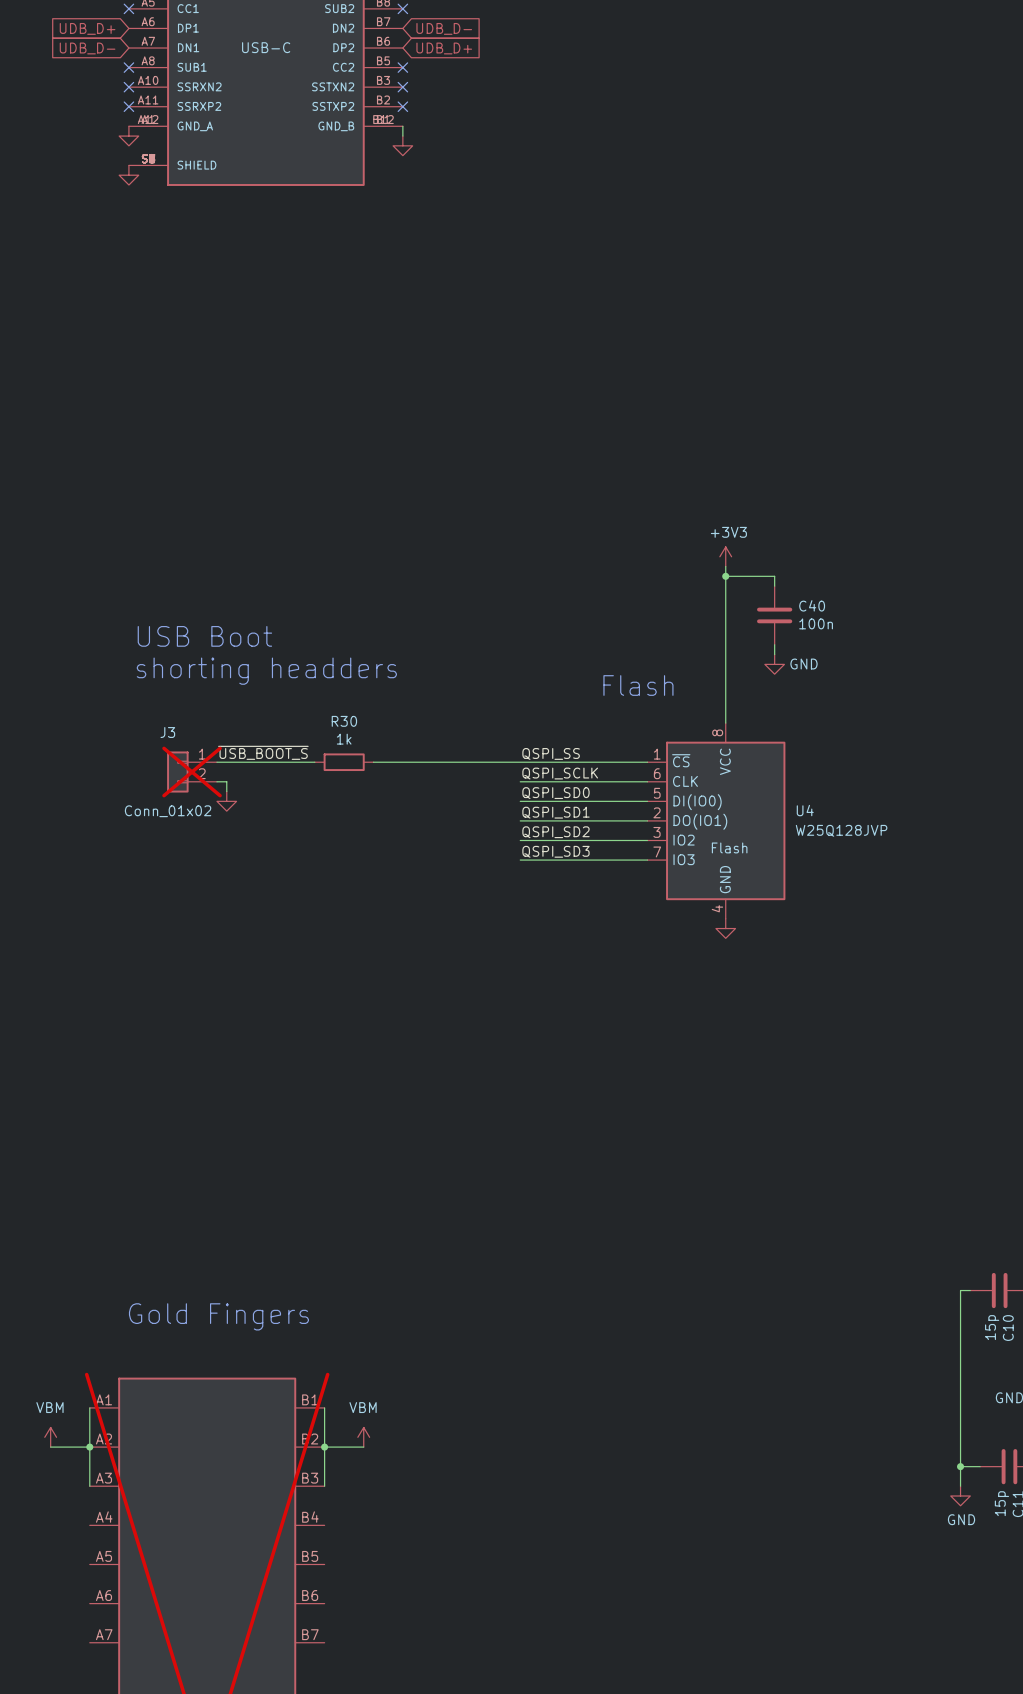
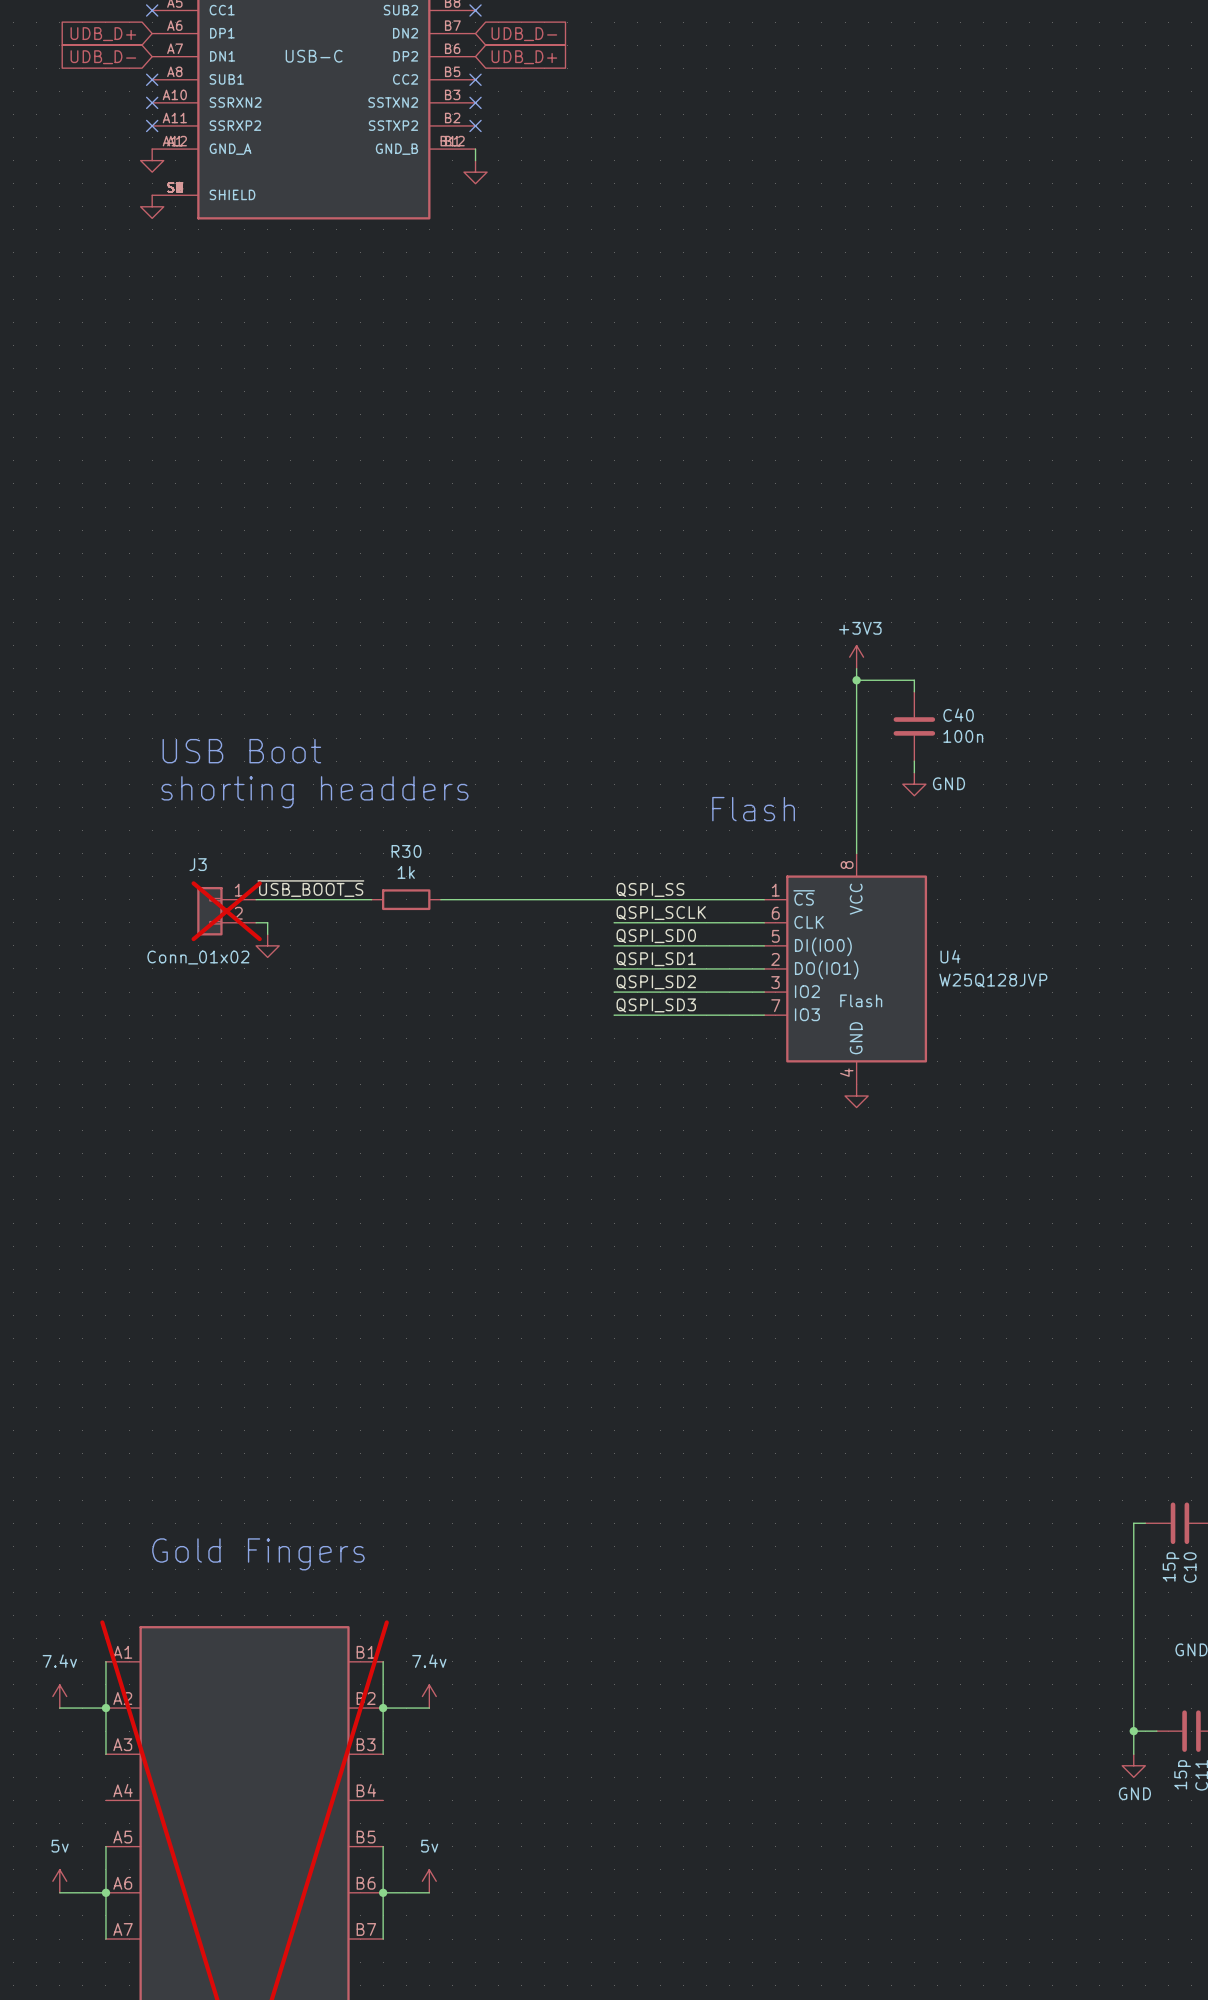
power symbol: VBM (50, 1437) -> 7.4v (59, 1696)
power symbol: VBM (363, 1437) -> 7.4v (429, 1696)
wire: none -> (105, 1846) (105, 1939)
wire: none -> (383, 1846) (383, 1939)
power symbol: none -> 5v (59, 1881)
power symbol: none -> 5v (429, 1881)
wire: none -> (59, 1892) (105, 1892)
junction: none -> (105, 1892)
wire: none -> (383, 1892) (429, 1892)
junction: none -> (383, 1892)

